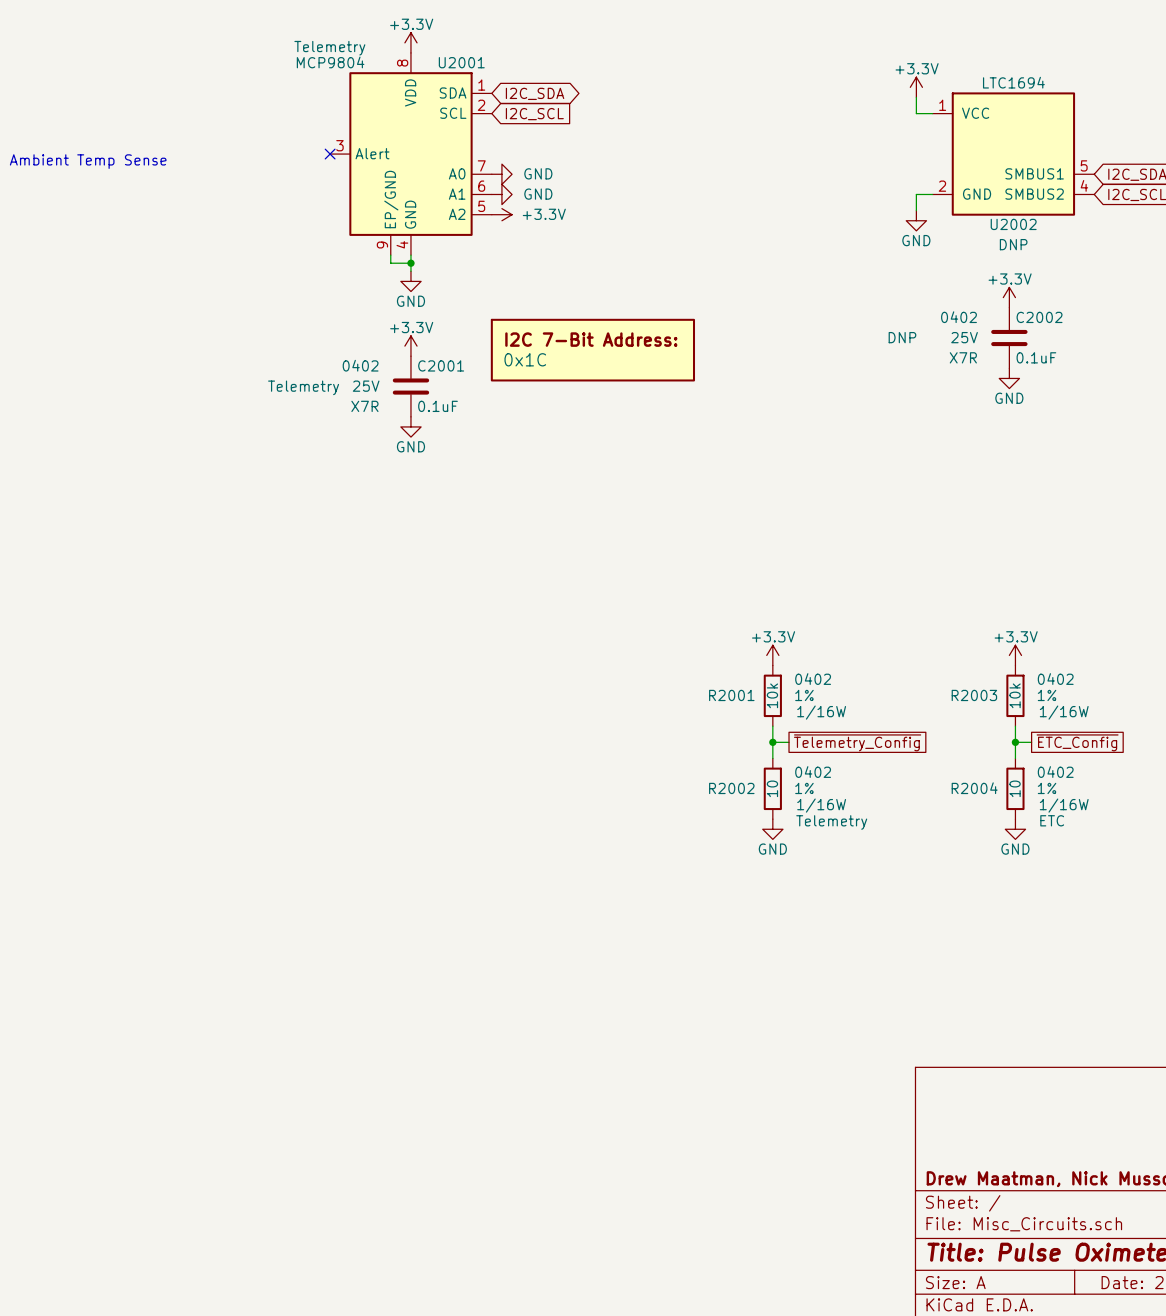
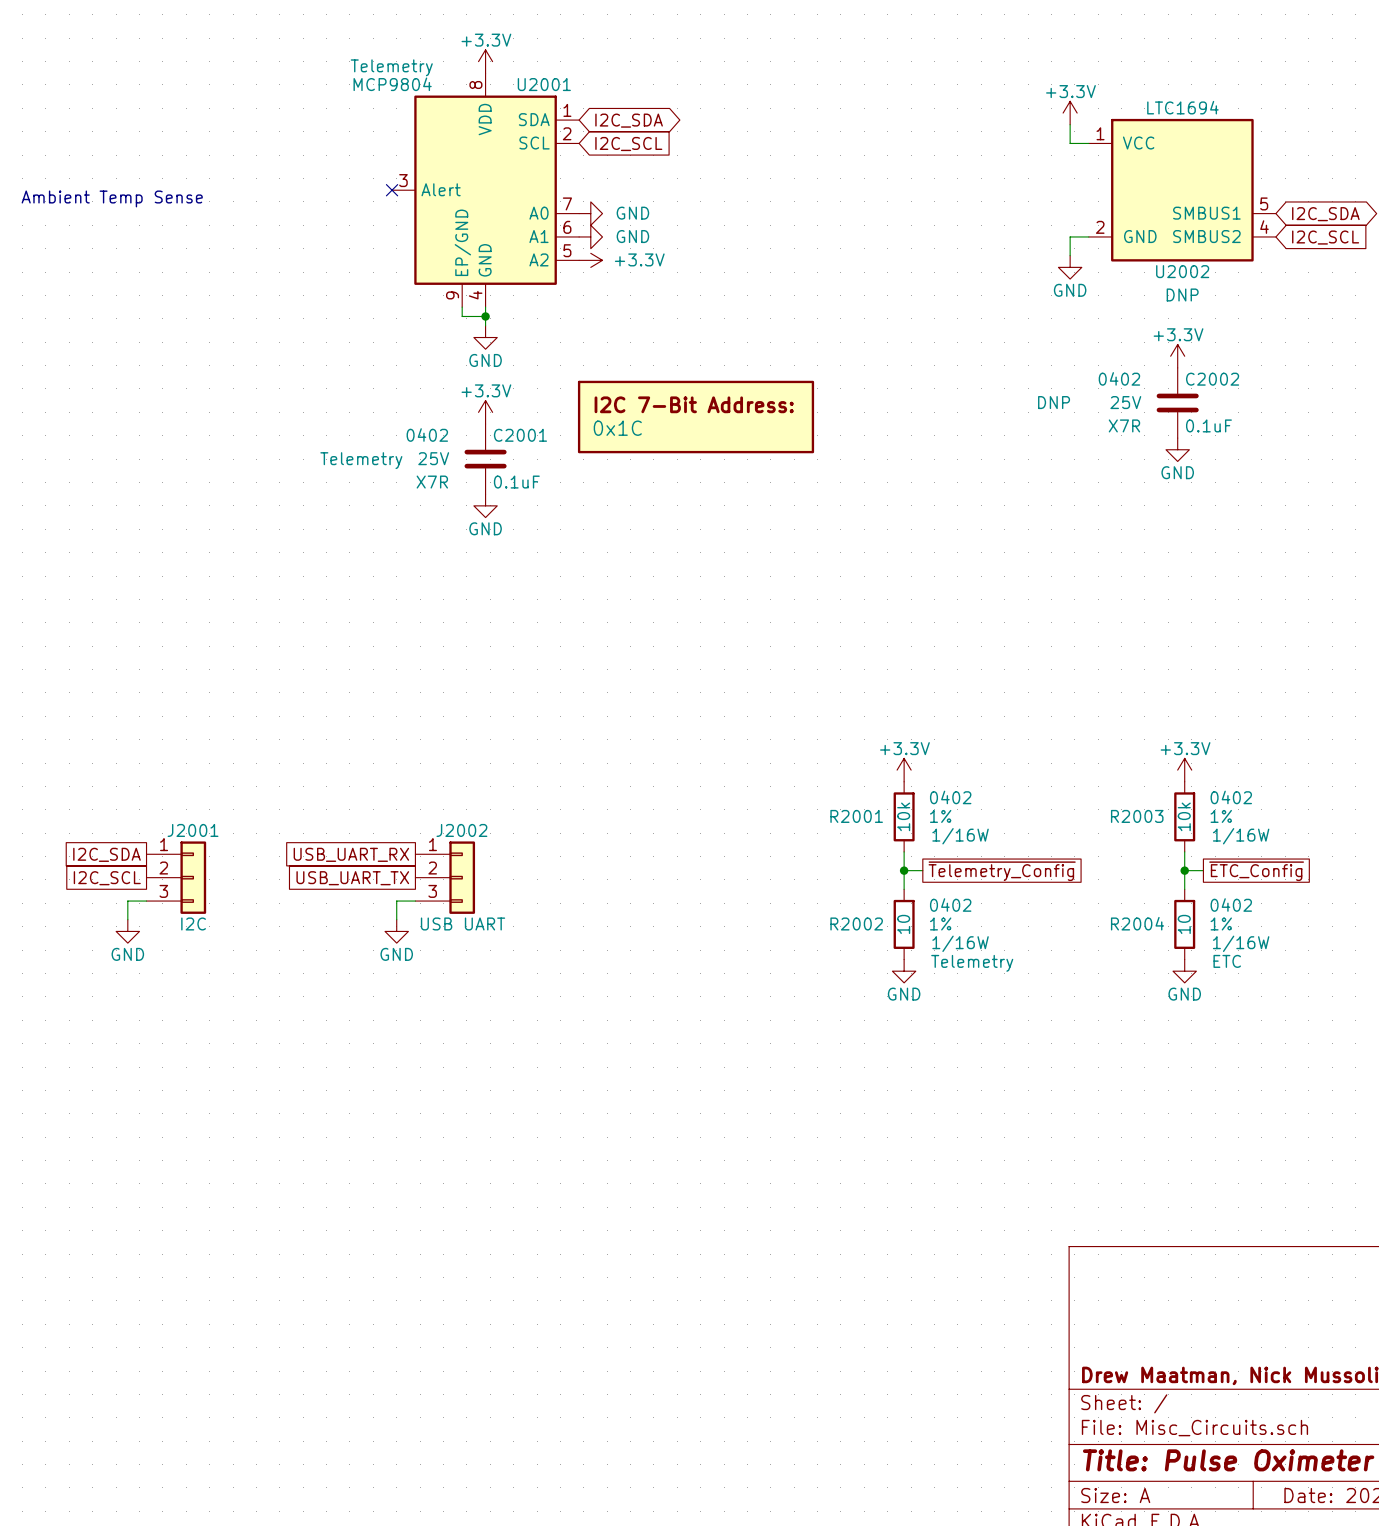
global label: none -> I2C_SDA (106, 854)
global label: none -> USB_UART_RX (351, 854)
global label: none -> I2C_SCL (107, 878)
J2001: none -> I2C (176, 877)
global label: none -> USB_UART_TX (352, 878)
J2002: none -> USB UART (445, 877)
wire: none -> (146, 901) (127, 901) (127, 919)
wire: none -> (415, 901) (396, 901) (396, 919)
power symbol: none -> GND (127, 931)
power symbol: none -> GND (396, 931)

